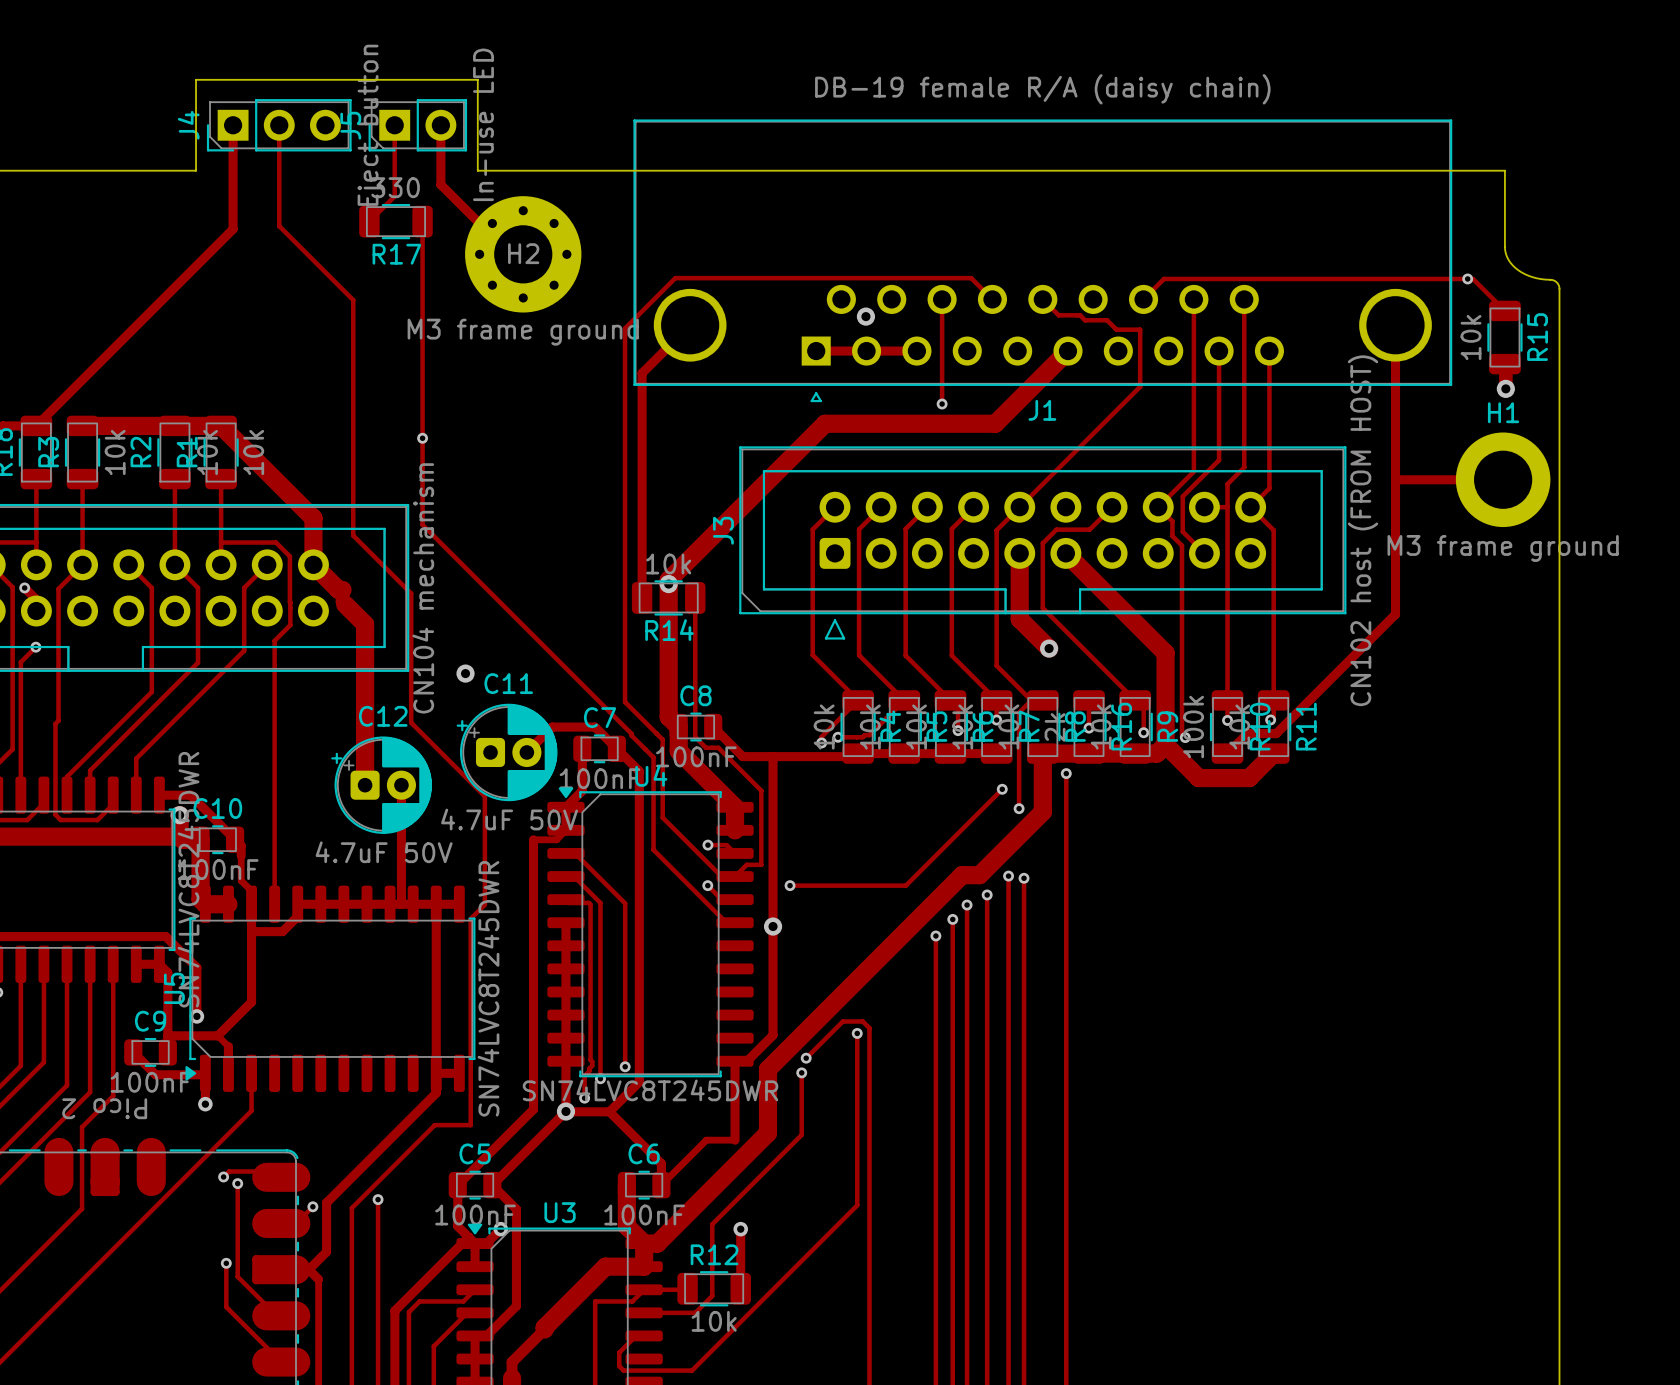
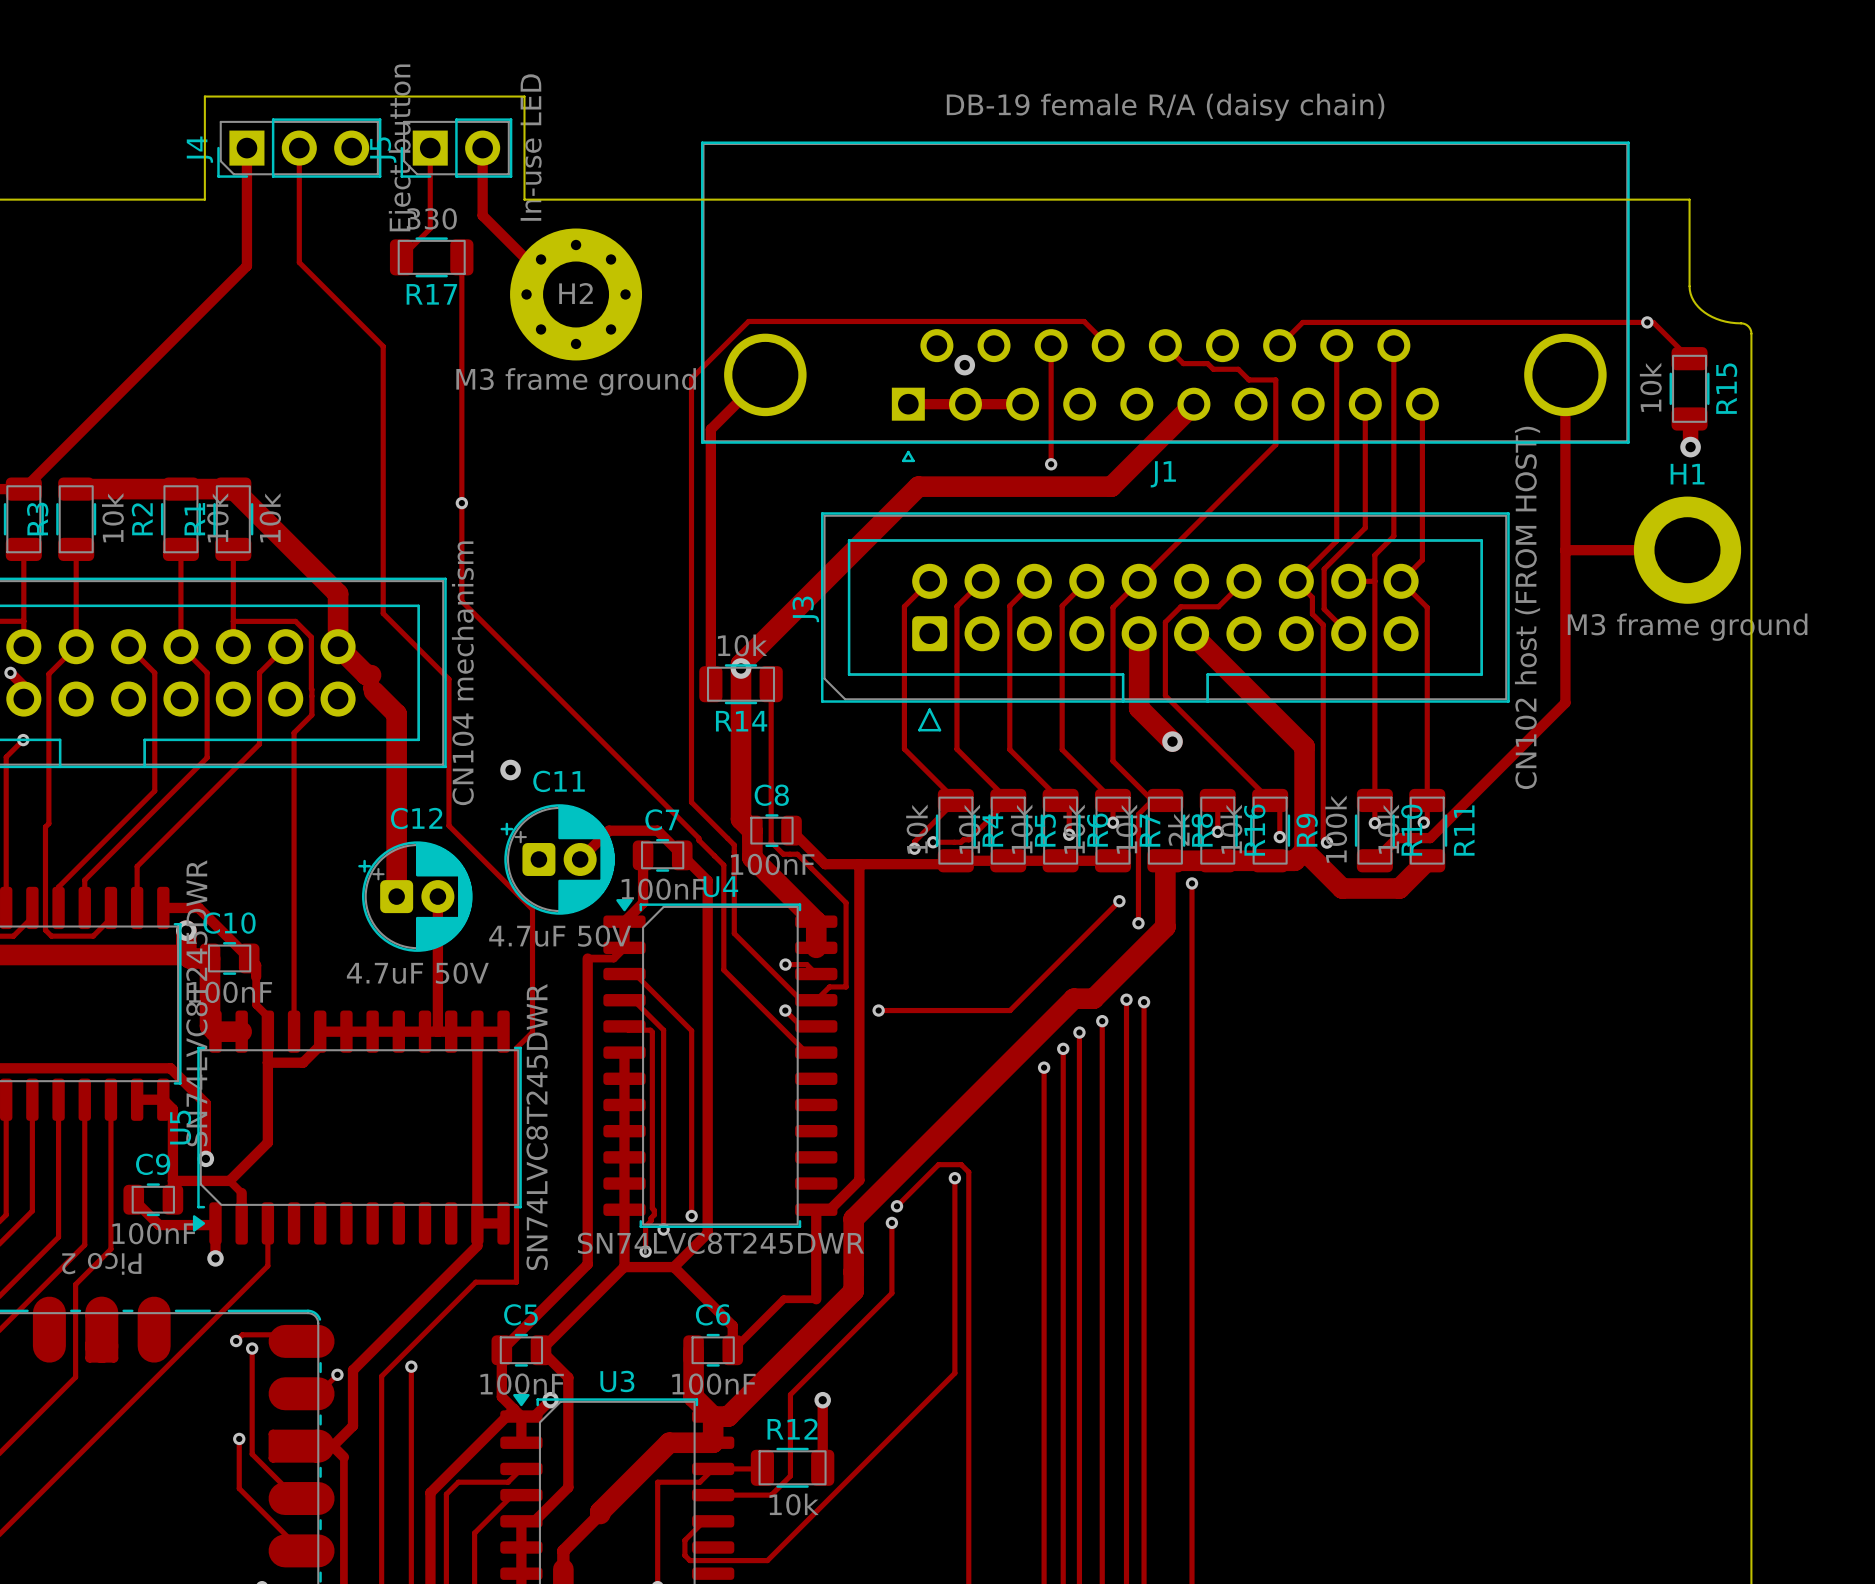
via: (773, 926) -> none
via: (565, 1111) -> none

